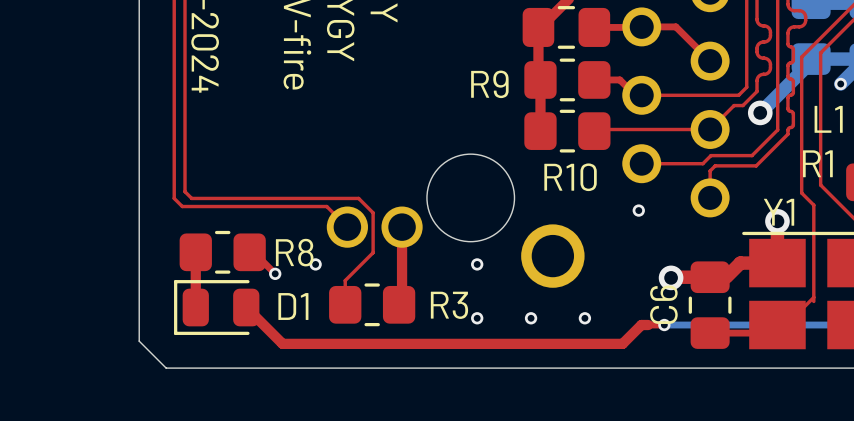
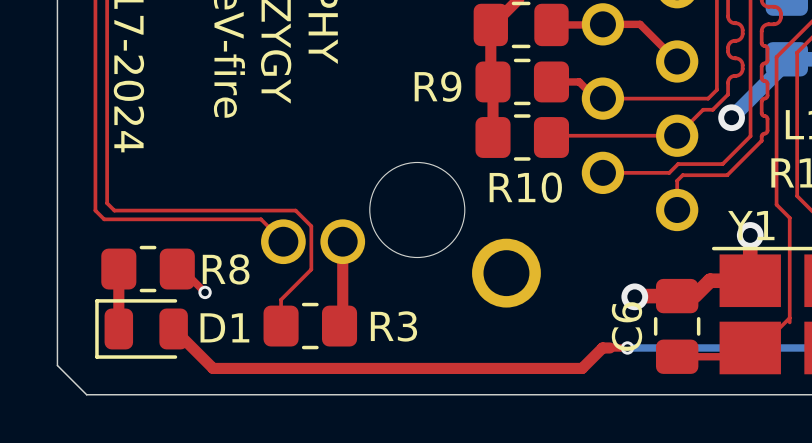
via: (638, 210) -> none
via: (315, 264) -> none
via: (477, 264) -> none
via: (477, 318) -> none
via: (531, 318) -> none
via: (584, 318) -> none

